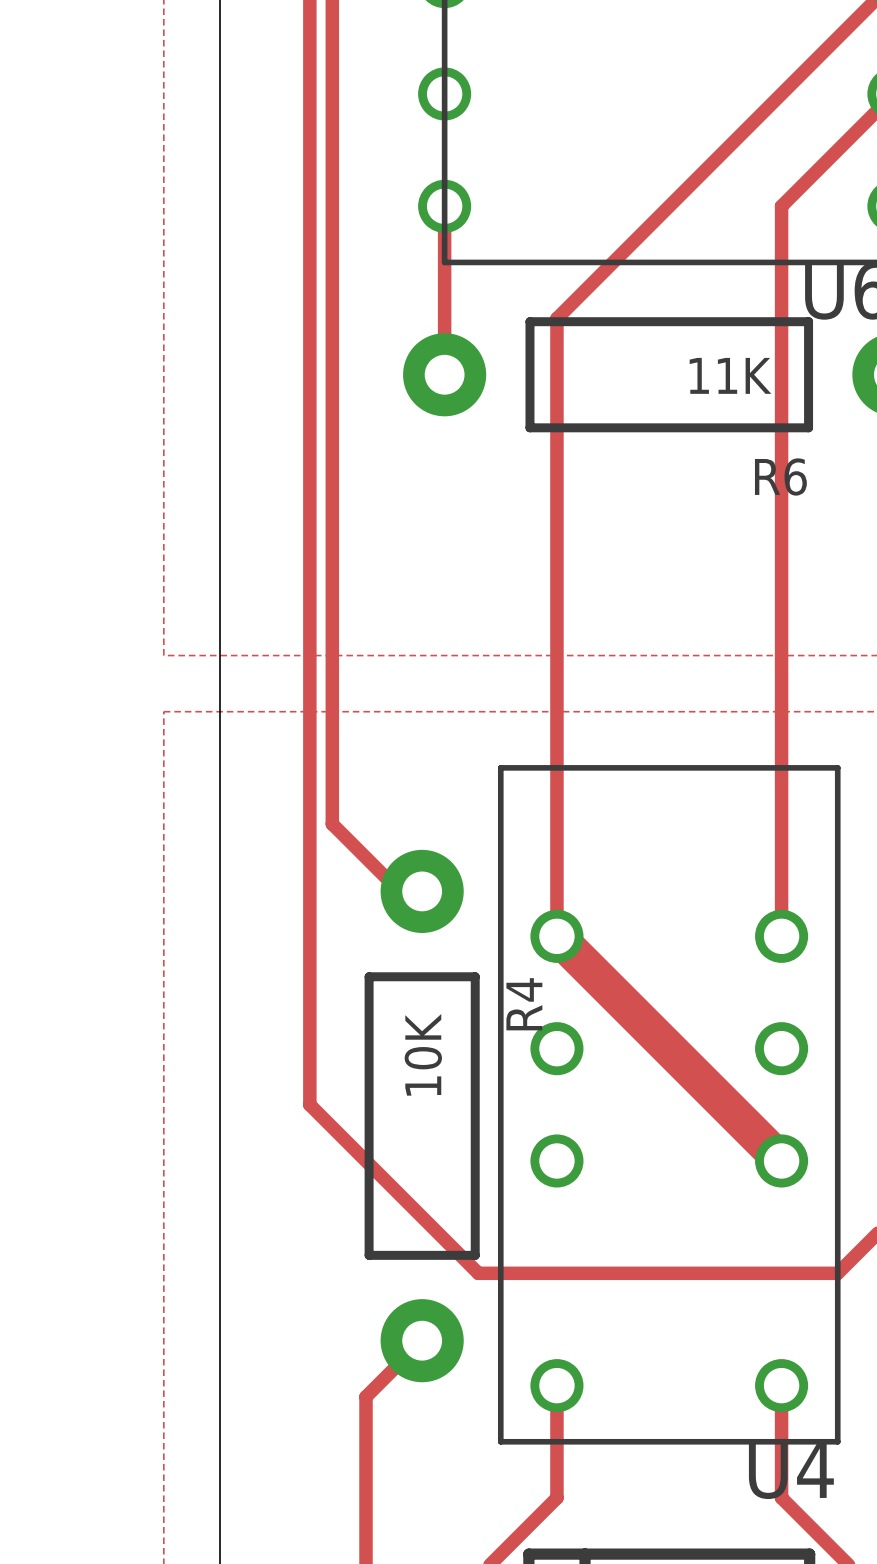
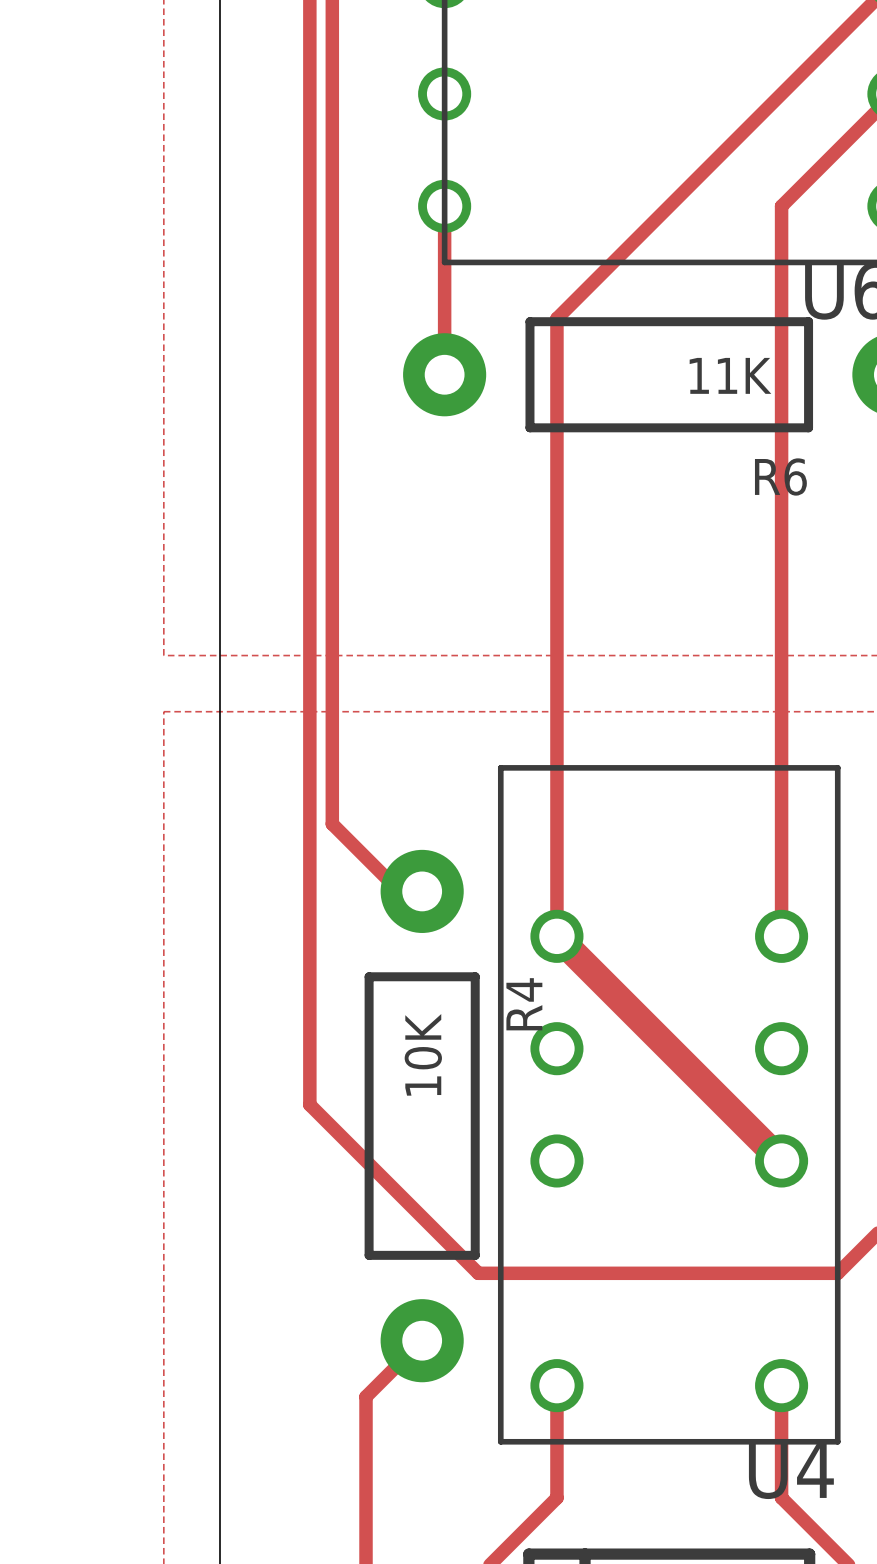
track width: thick (556, 936) (781, 1160) -> thin (556, 936) (781, 1160)

